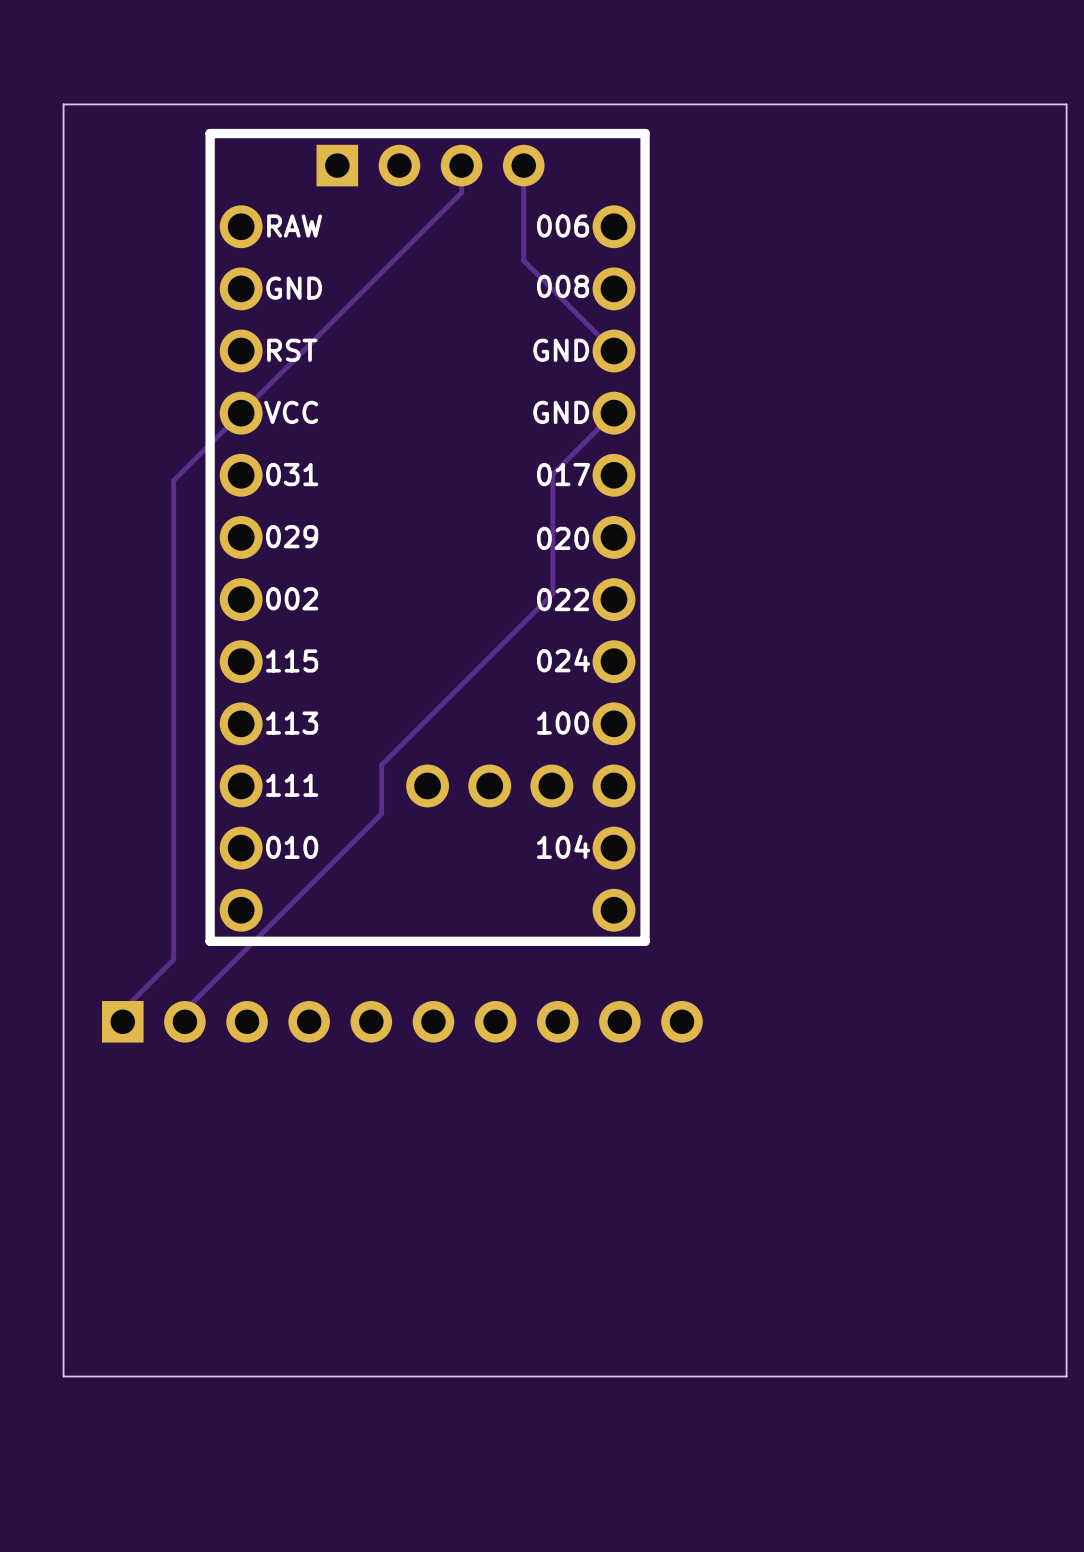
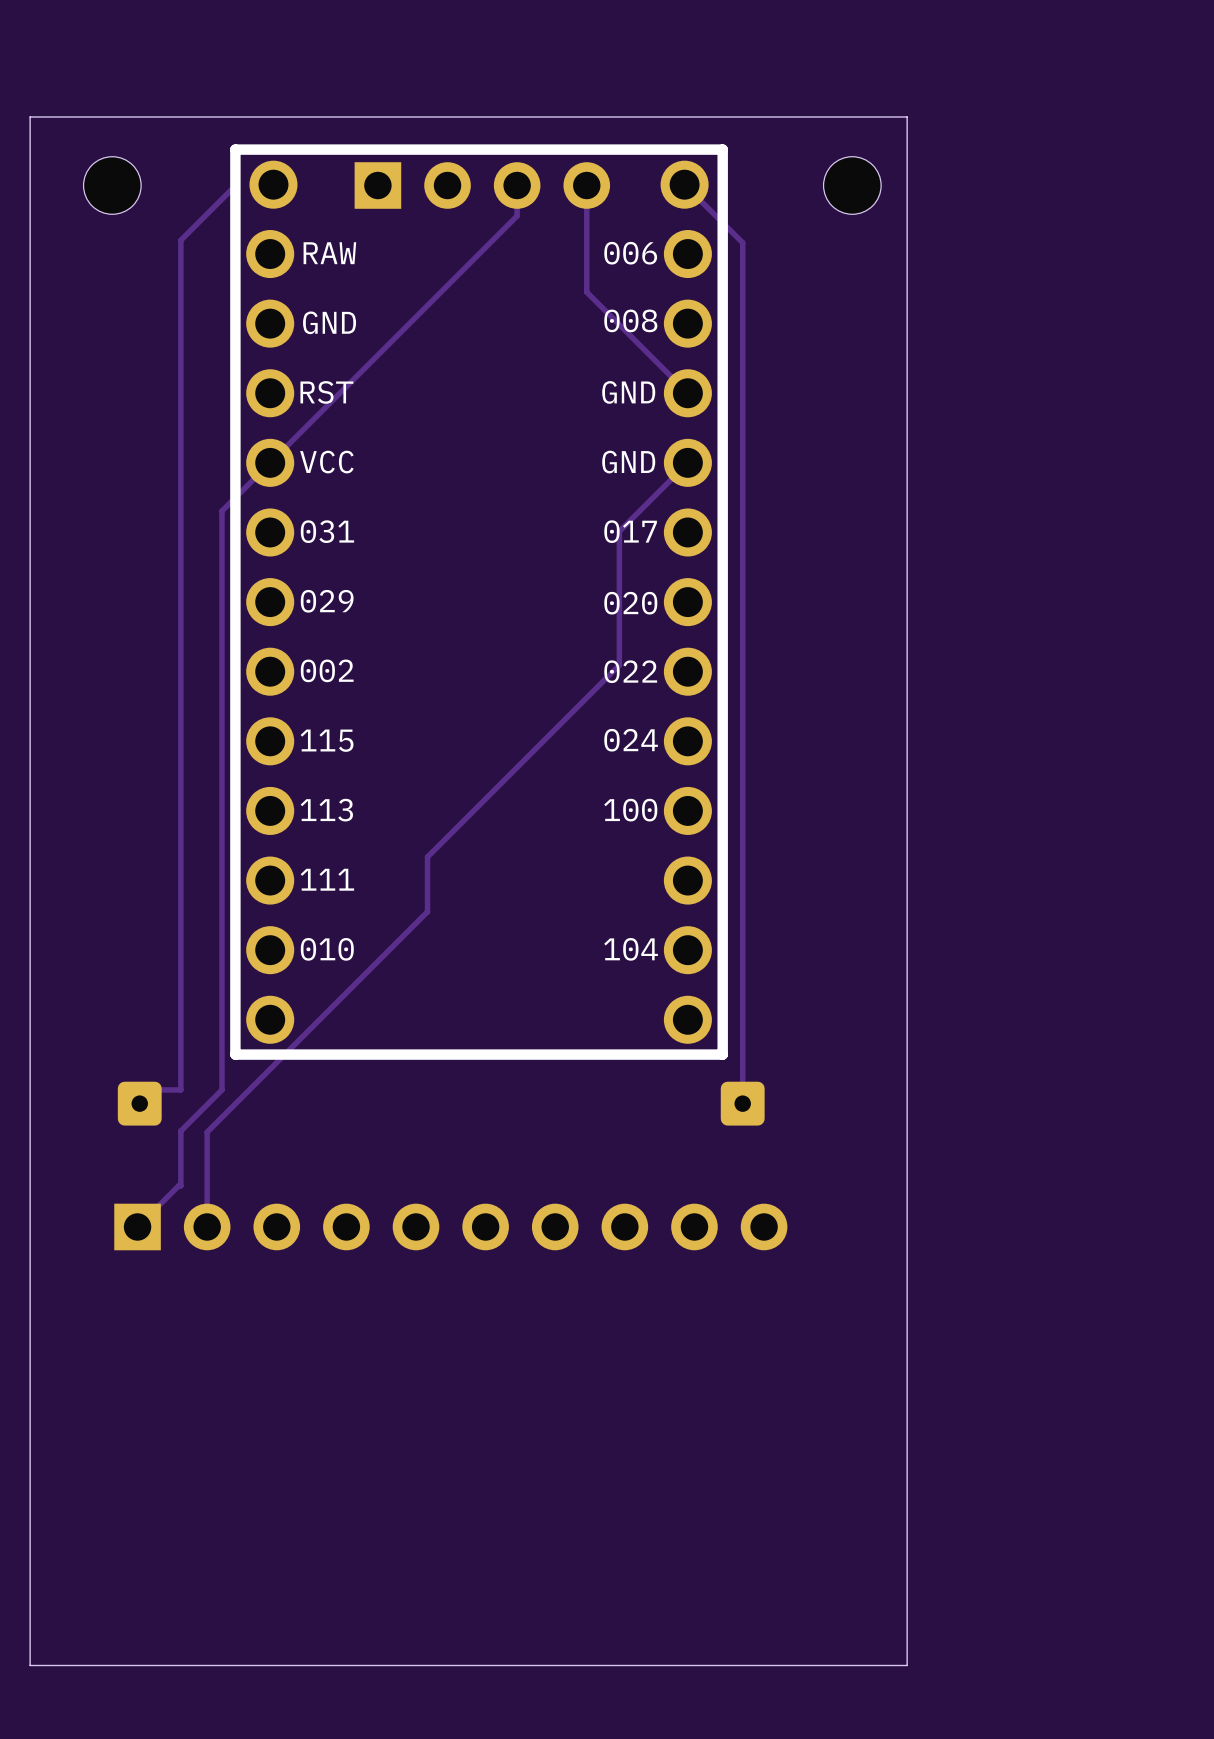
board edge: (809, 104) (1066, 104) (1066, 1376) (63, 1376) (63, 104) -> (907, 116) (907, 1665) (30, 1665) (30, 116) (71, 116)
part footprint: [205, 128, 650, 946] -> [230, 144, 728, 1060]
track: none -> (684, 184) (742, 242) (742, 1089)
part: none -> (112, 185)
track: none -> (235, 185) (180, 240) (180, 1089) (156, 1089)
part: none -> (852, 185)
track: (198, 456) (173, 480) (173, 959) (129, 1004) -> (221, 511) (221, 1089) (180, 1131) (180, 1185) (178, 1185) (137, 1226)
part: none -> (139, 1103)
part: none -> (742, 1103)
track: none -> (214, 1125) (207, 1132) (207, 1226)
part position: (402, 1021) -> (450, 1226)

